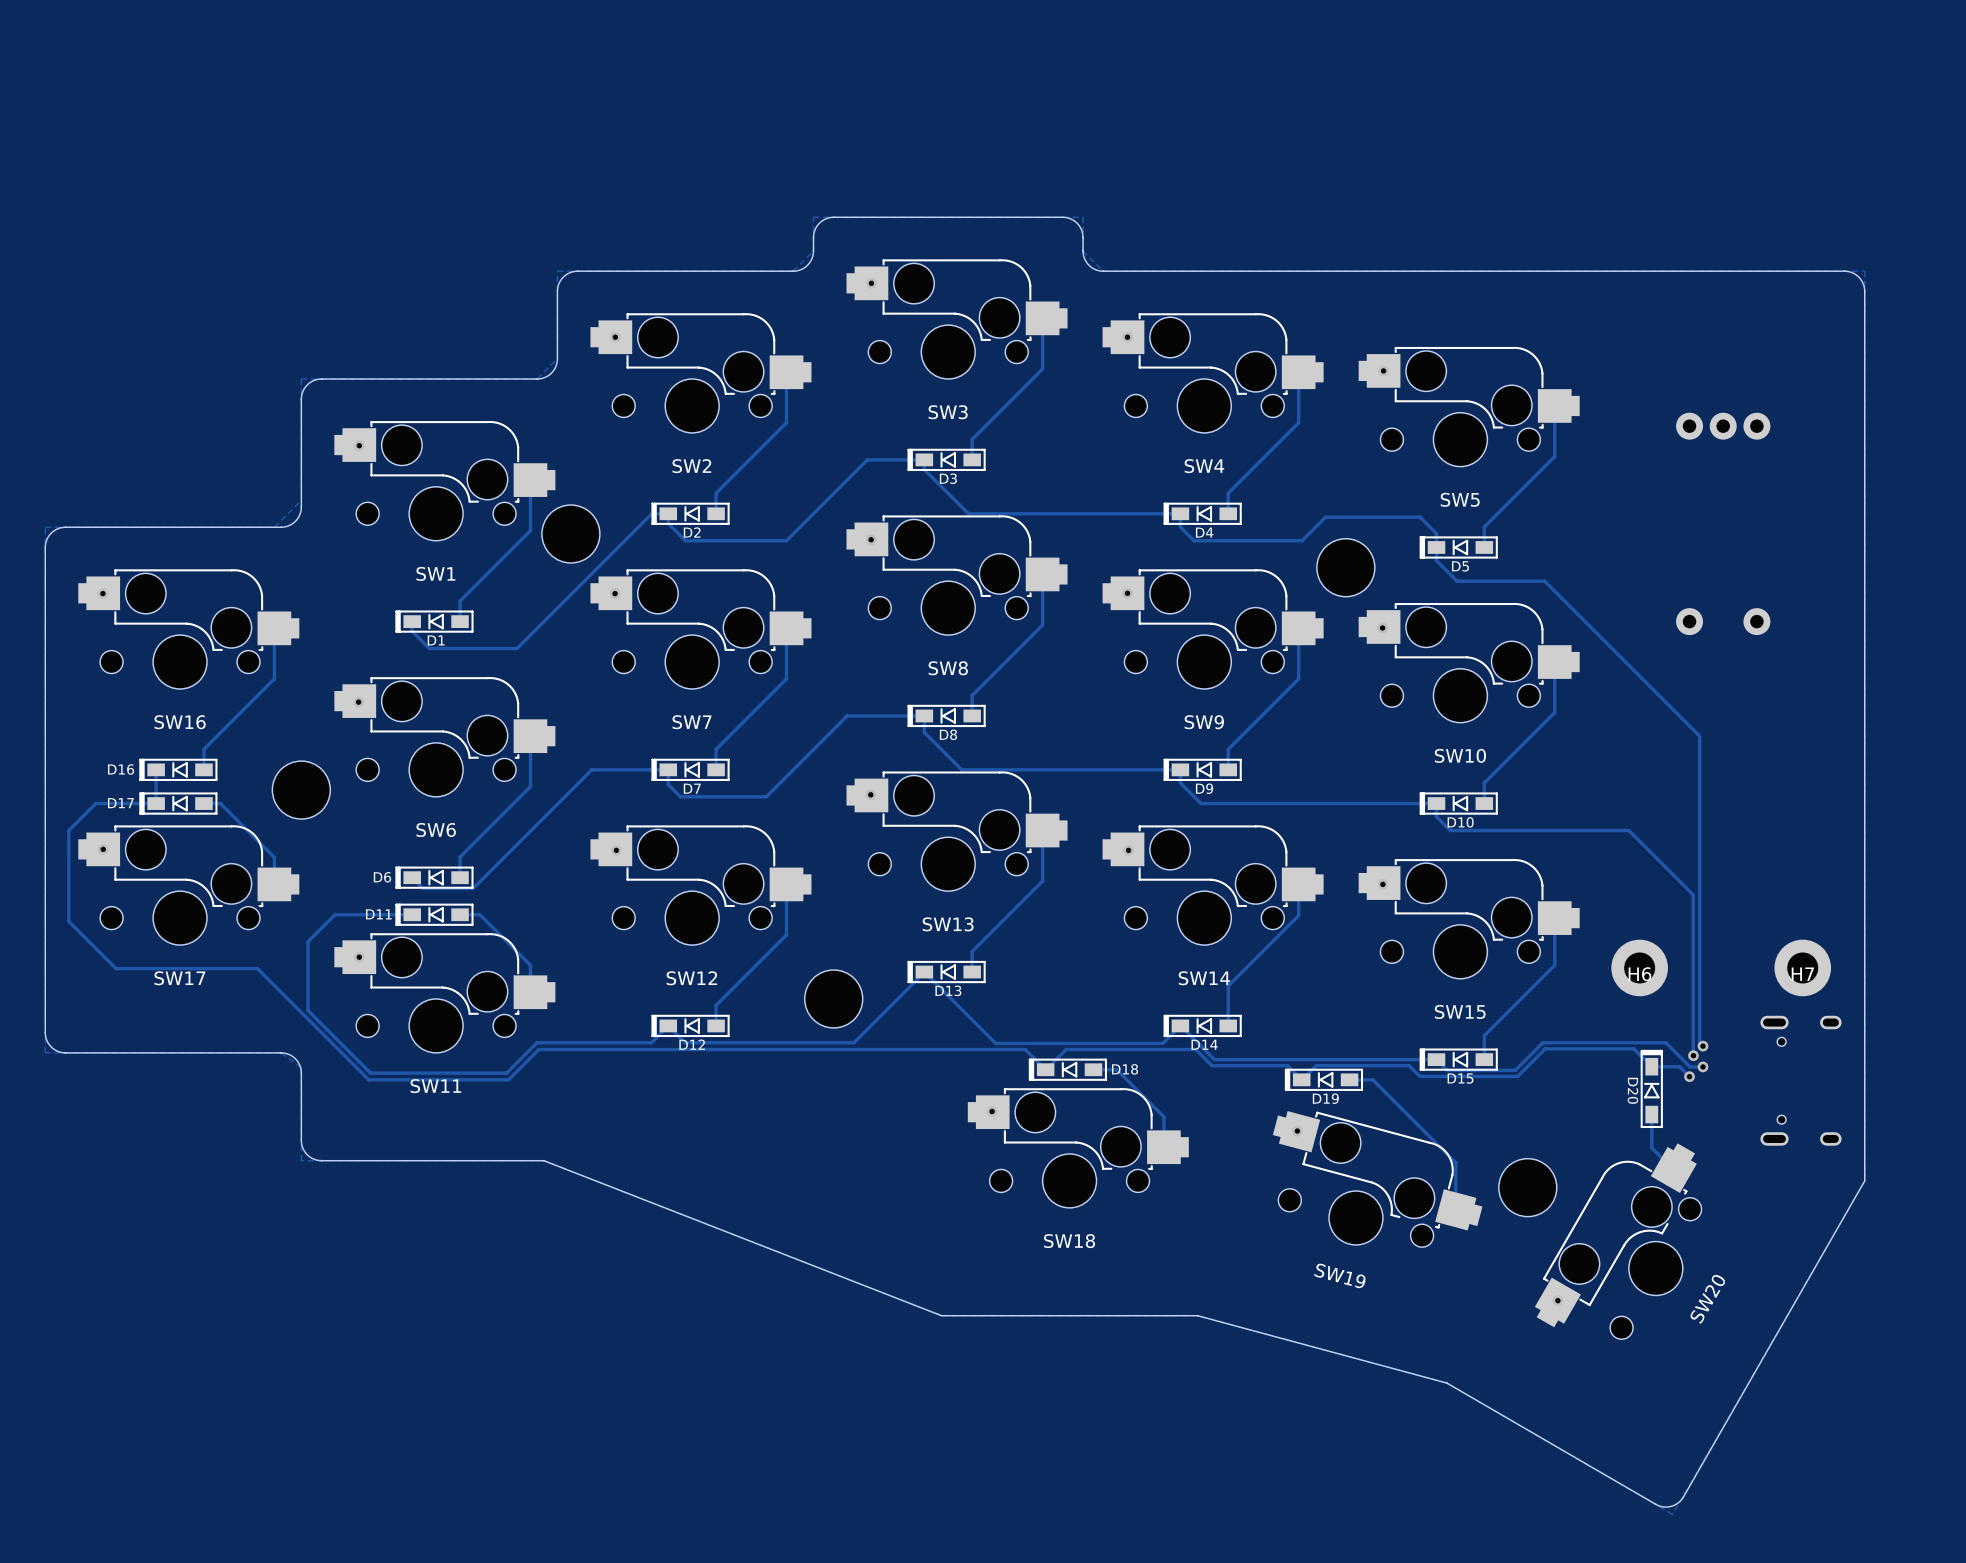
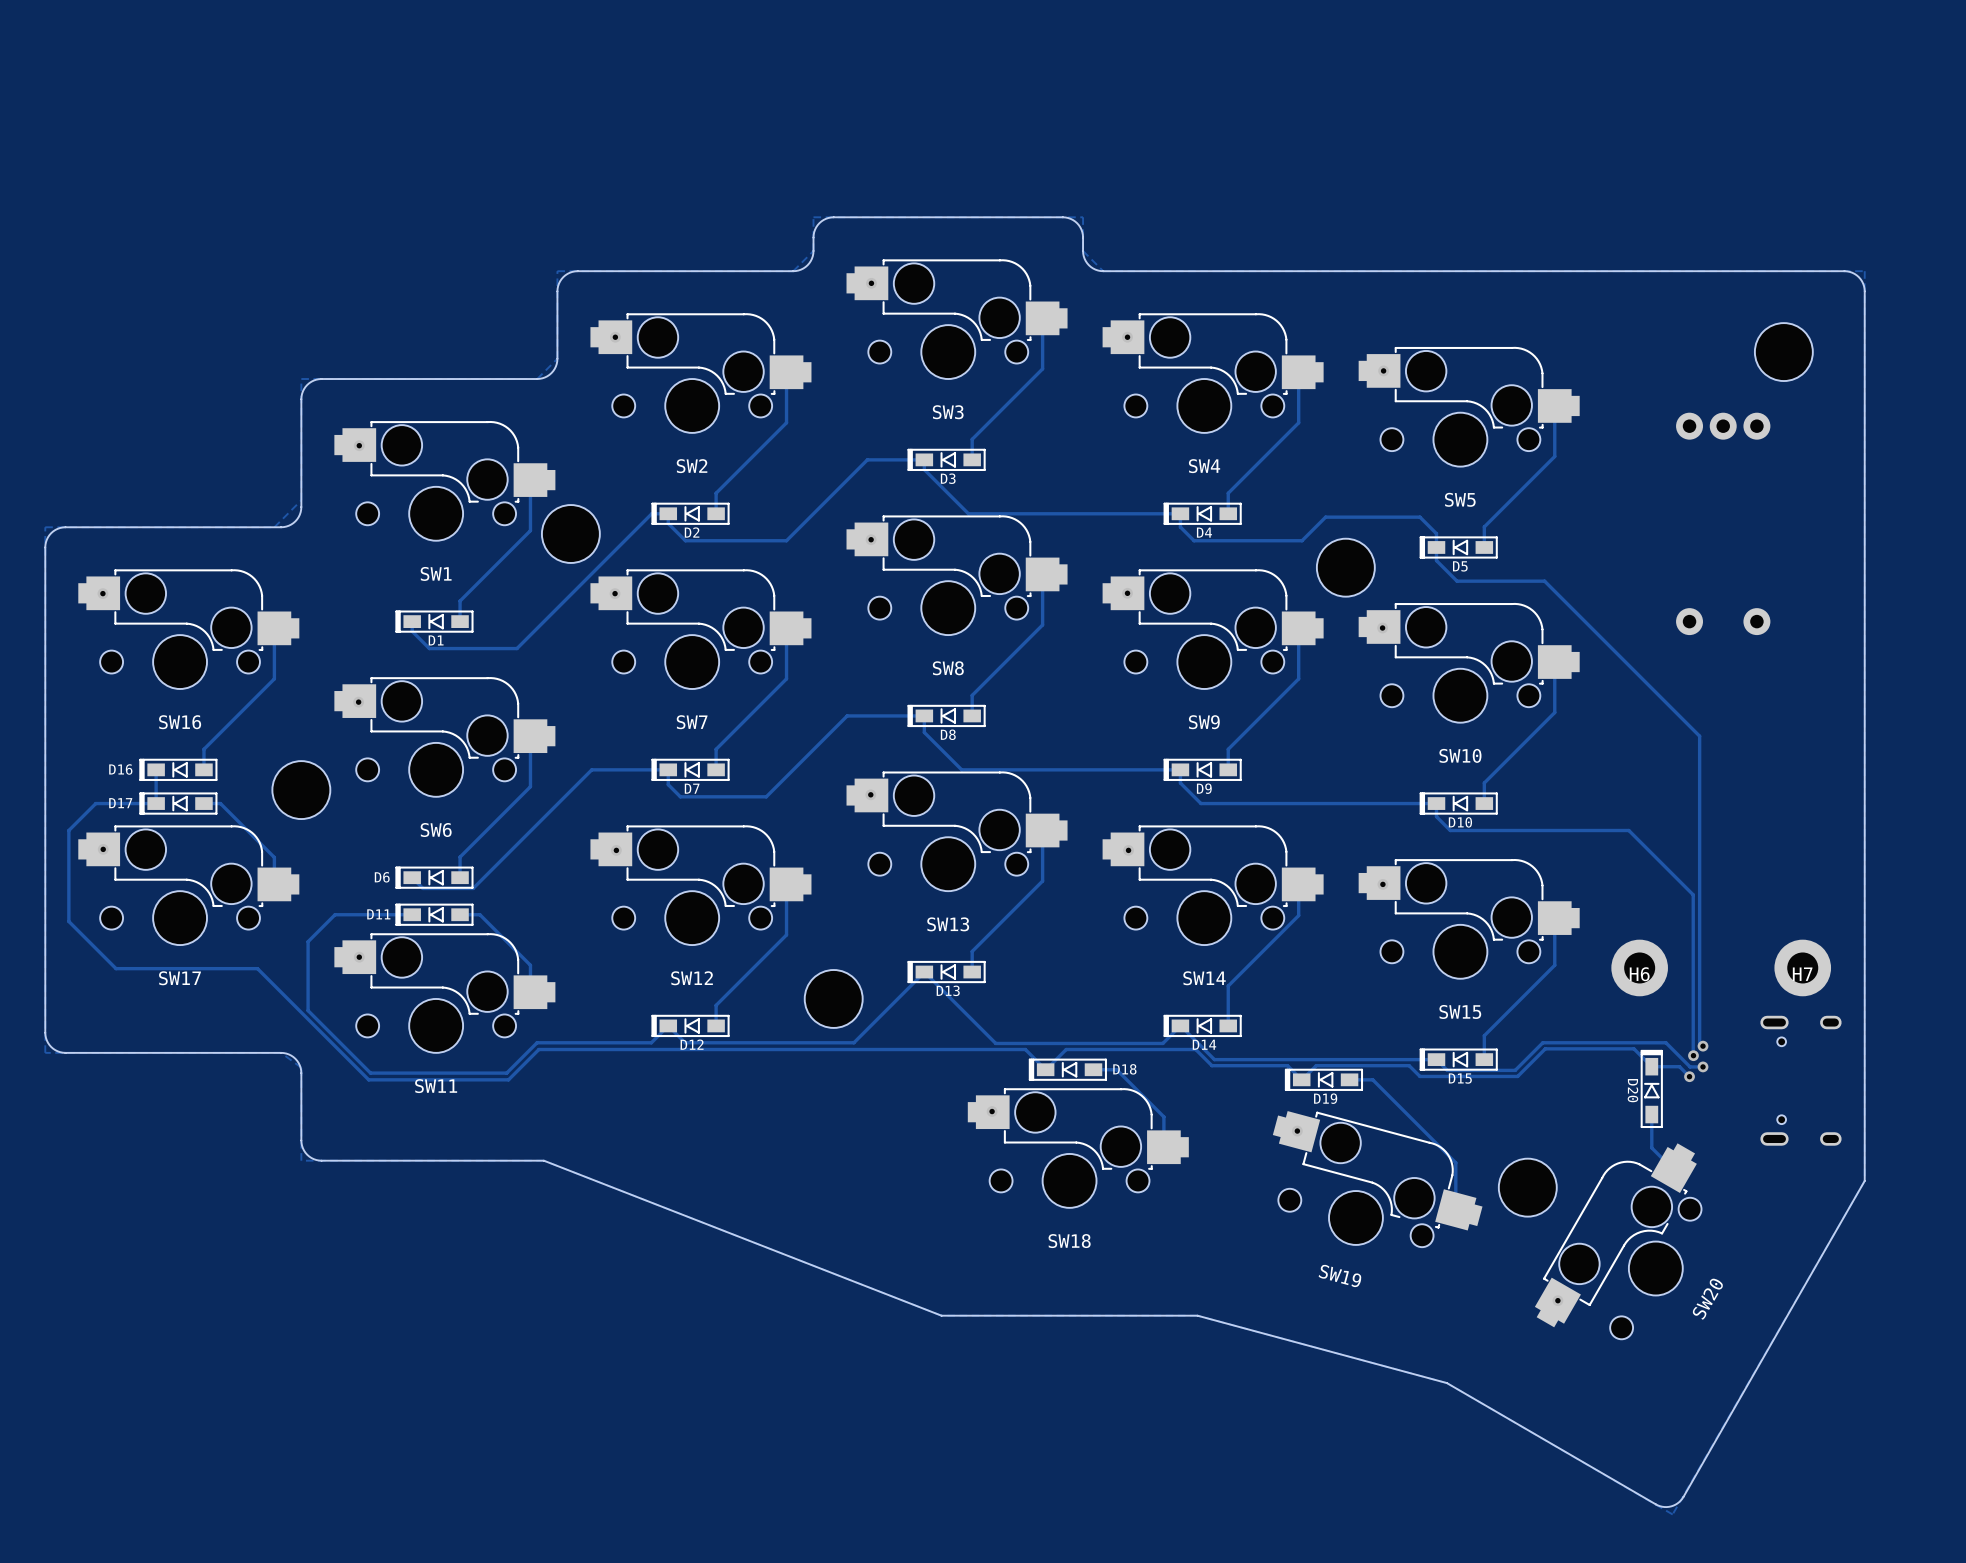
part: none -> (1783, 352)

